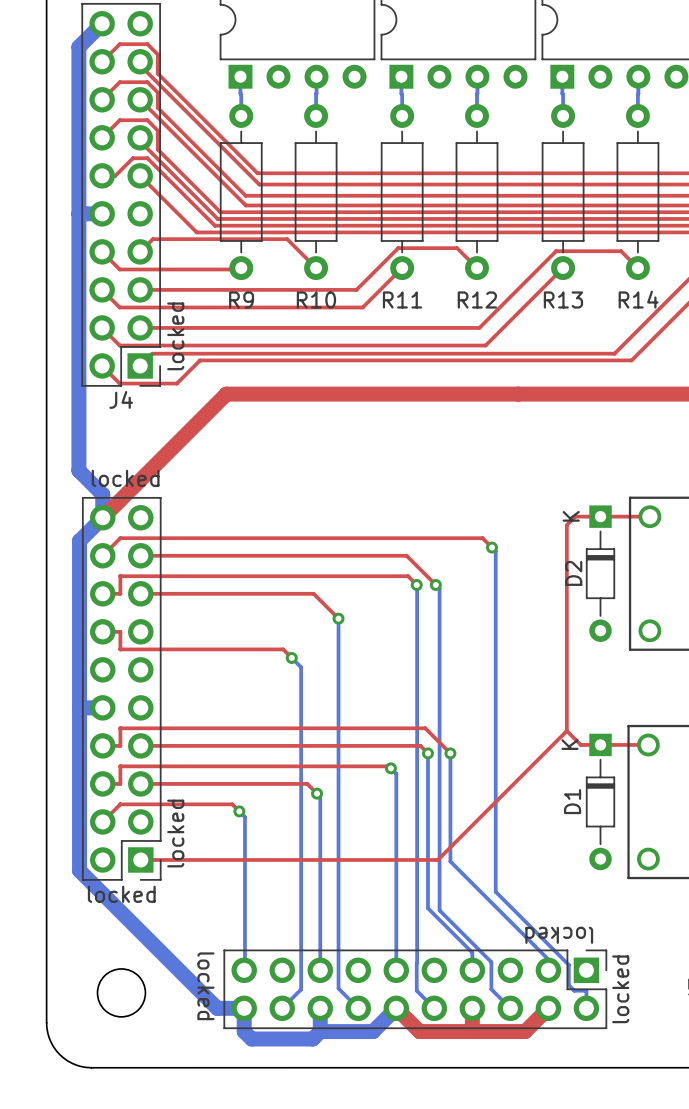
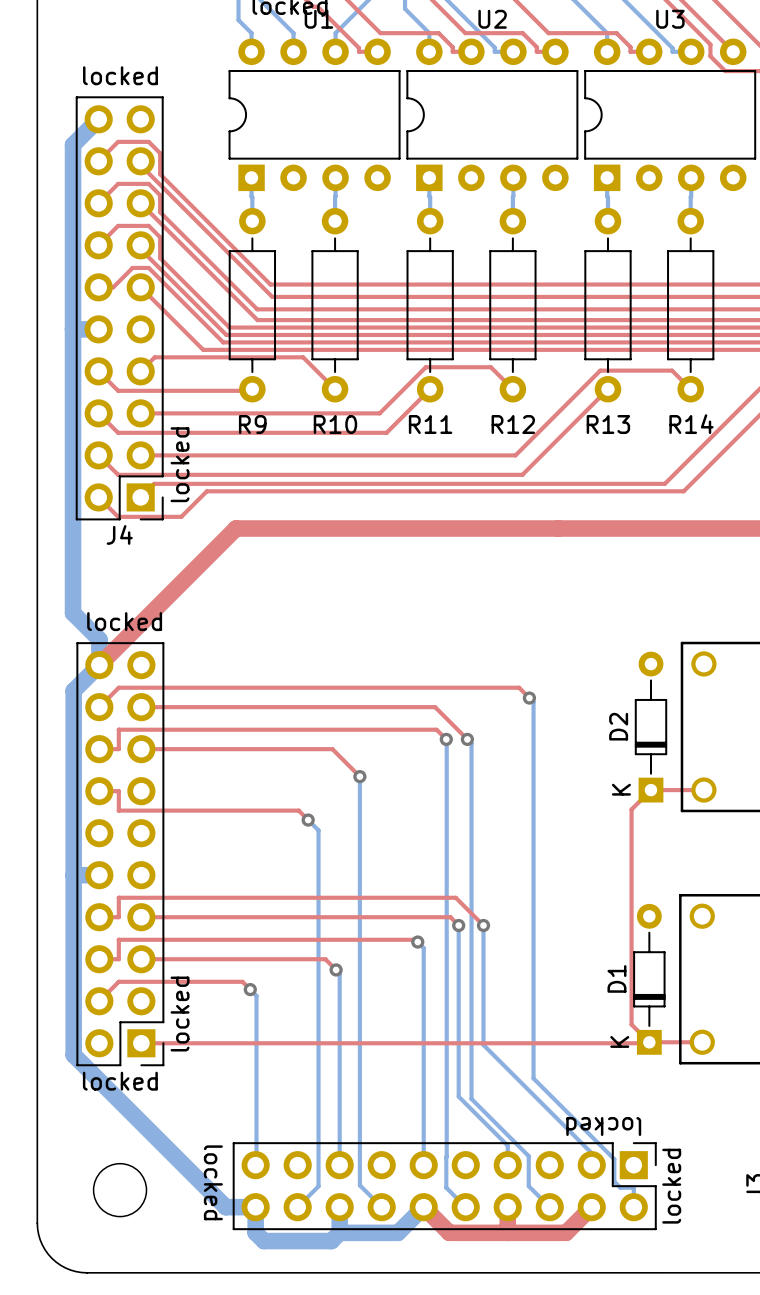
D2 footprint: [585, 505, 616, 642] -> [634, 651, 668, 803]
top track: (649, 516) (575, 516) (566, 525) (566, 730) -> none
top track: none -> (703, 790) (651, 790) (631, 809) (631, 1024) (649, 1042) (702, 1042)
top track: (566, 730) (437, 859) -> (648, 1043) (469, 1043)
top track: (566, 730) (580, 744) (648, 744) -> none
D1 footprint: [585, 733, 616, 871] -> [633, 903, 666, 1055]

